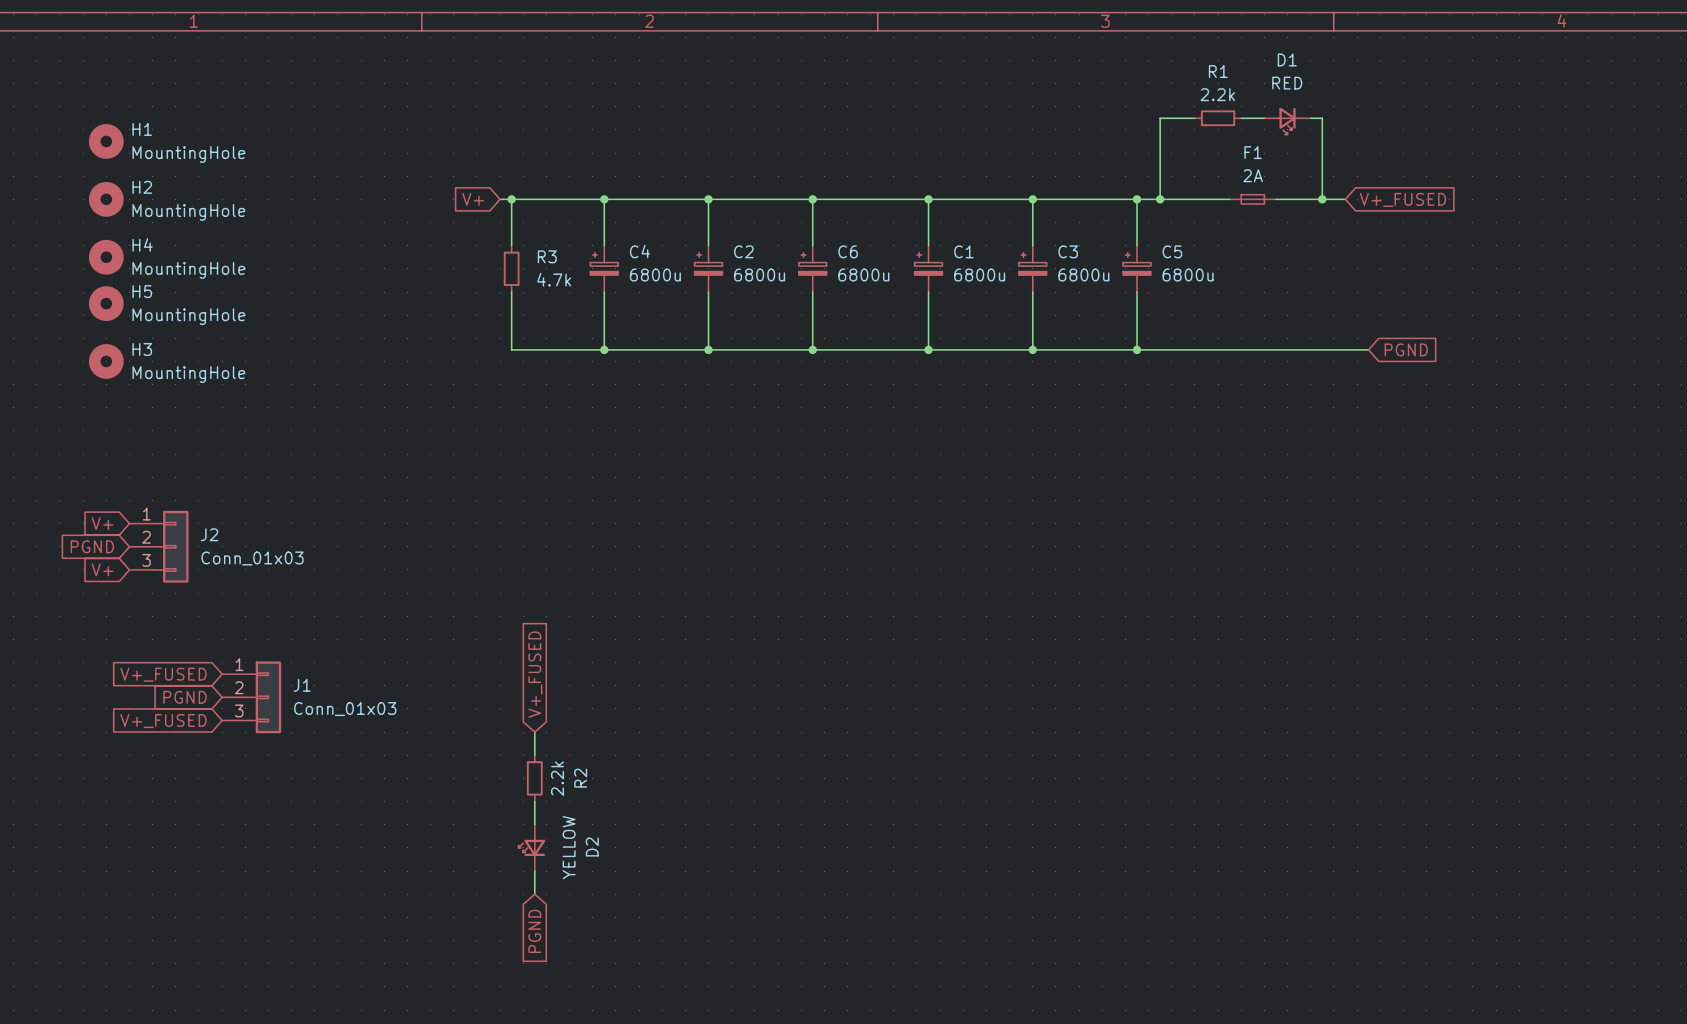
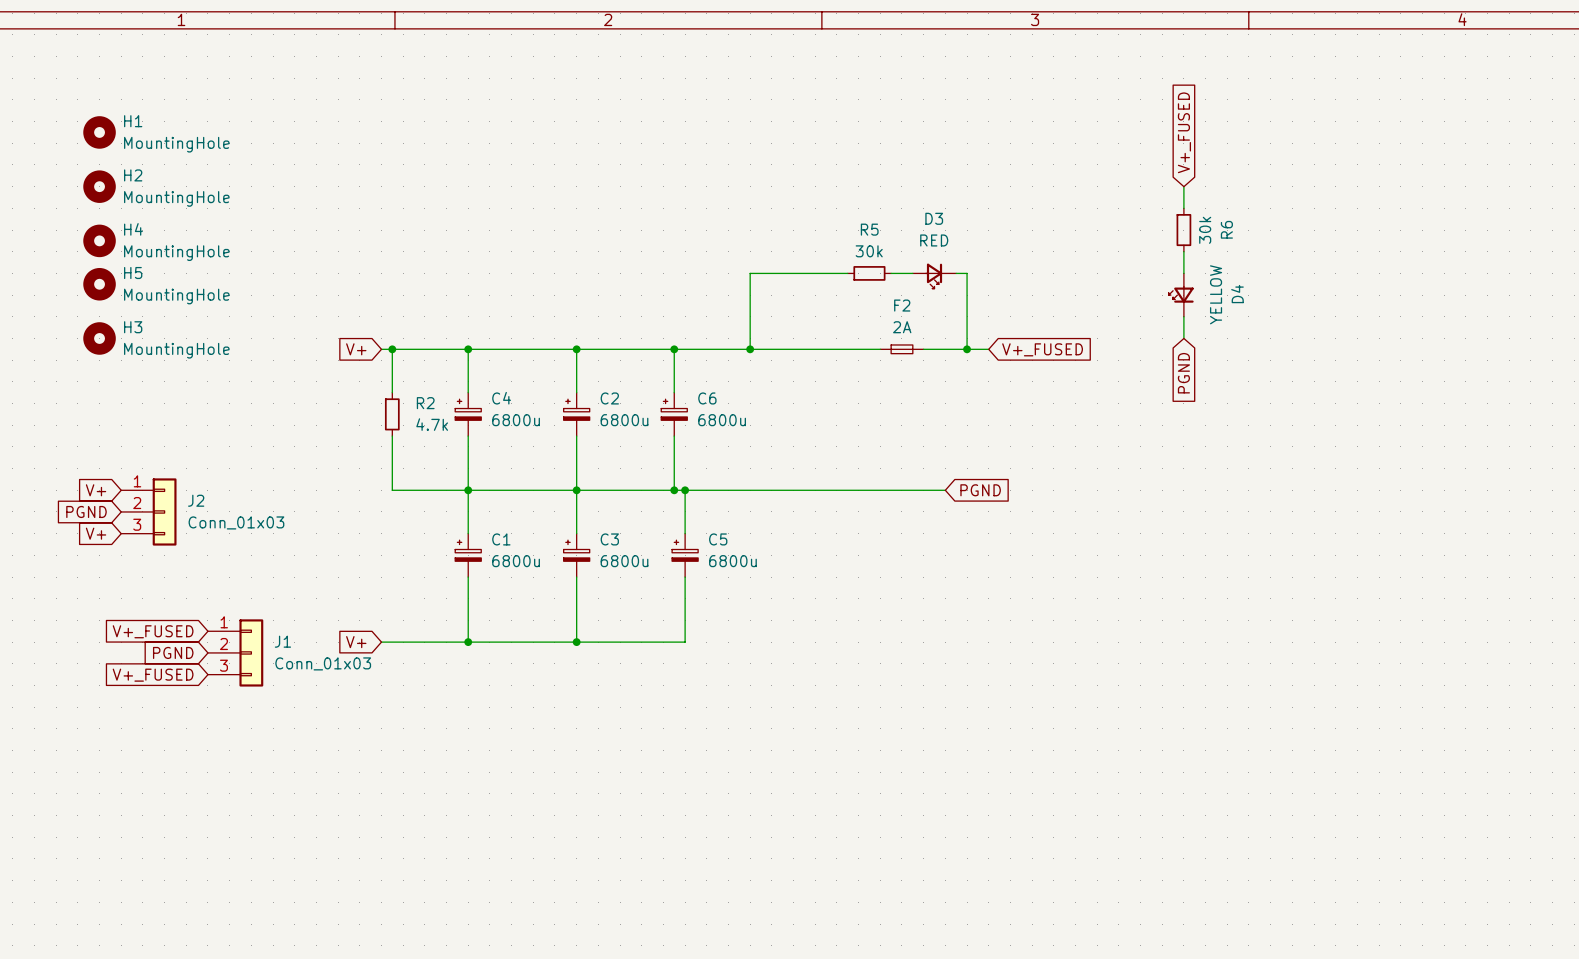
wire: (1194, 118) (1160, 118) (1160, 199) -> none
R1: 2.2k (1218, 118) -> none
wire: (1241, 118) (1264, 118) -> none
wire: (1310, 118) (1322, 118) (1322, 199) -> none
D1: RED (1287, 121) -> none
global label position: V+ (473, 199) -> V+ (356, 349)
wire: (500, 199) (1229, 199) -> none
wire: (511, 199) (511, 245) -> (392, 349) (392, 392)
junction: (511, 199) -> none
wire: (604, 199) (604, 245) -> (468, 349) (468, 392)
junction: (604, 199) -> none
wire: (708, 199) (708, 245) -> (576, 349) (576, 392)
junction: (708, 199) -> none
wire: (812, 199) (812, 245) -> (674, 349) (674, 392)
junction: (812, 199) -> none
wire: (928, 199) (928, 245) -> none
junction: (928, 199) -> none
wire: (1032, 199) (1032, 245) -> none
junction: (1032, 199) -> none
wire: (1137, 199) (1137, 245) -> none
junction: (1137, 199) -> none
junction: (1160, 199) -> none
F1: 2A (1252, 199) -> none
wire: none -> (1183, 186) (1183, 208)
wire: (1275, 199) (1345, 199) -> none
junction: (1322, 199) -> none
global label rotation: 0° (1402, 199) -> 90° counterclockwise (1184, 132)
global label position: V+_FUSED (1402, 199) -> V+_FUSED (1184, 132)
R6: none -> 30k (1183, 230)
R3: 4.7k (511, 268) -> none
C4 position: (604, 268) -> (468, 414)
C2 position: (708, 268) -> (576, 414)
C6 position: (812, 268) -> (674, 414)
C1 position: (928, 268) -> (468, 555)
C3 position: (1032, 268) -> (576, 555)
C5 position: (1137, 268) -> (685, 555)
wire: none -> (1183, 251) (1183, 273)
wire: (511, 292) (511, 349) (1368, 349) -> none
wire: (604, 292) (604, 349) -> none
wire: (708, 292) (708, 349) -> none
wire: (812, 292) (812, 349) -> (674, 436) (674, 490)
wire: none -> (847, 273) (750, 273) (750, 349)
wire: (928, 292) (928, 349) -> none
R5: none -> 30k (869, 273)
wire: none -> (891, 273) (912, 273)
wire: none -> (956, 273) (967, 273)
wire: (1137, 292) (1137, 349) -> none
D3: none -> RED (934, 276)
D4: none -> YELLOW (1181, 295)
wire: none -> (1183, 316) (1183, 338)
junction position: (604, 349) -> (576, 349)
junction position: (708, 349) -> (674, 349)
junction position: (812, 349) -> (750, 349)
junction: (928, 349) -> none
wire: none -> (967, 327) (967, 349)
junction position: (1032, 349) -> (967, 349)
junction: (1137, 349) -> none
global label rotation: 0° (1406, 349) -> 90° clockwise (1183, 373)
global label position: PGND (1406, 349) -> PGND (1183, 373)
wire: none -> (381, 349) (880, 349)
junction: none -> (392, 349)
junction: none -> (468, 349)
F2: none -> 2A (901, 349)
wire: none -> (923, 349) (988, 349)
global label: none -> V+_FUSED (1042, 349)
wire: none -> (392, 436) (392, 490) (945, 490)
wire: none -> (468, 436) (468, 533)
wire: none -> (576, 436) (576, 533)
junction: none -> (468, 490)
junction: none -> (576, 490)
junction: none -> (674, 490)
wire: none -> (685, 490) (685, 533)
junction: none -> (685, 490)
global label: none -> PGND (980, 490)
wire: none -> (468, 577) (468, 642)
wire: none -> (576, 577) (576, 642)
wire: none -> (685, 577) (685, 642) (381, 642)
global label: V+_FUSED (535, 674) -> none
global label: none -> V+ (356, 642)
junction: none -> (468, 642)
junction: none -> (576, 642)
wire: (534, 732) (534, 755) -> none
R2 position: (534, 778) -> (392, 414)
R2 value: 2.2k (557, 778) -> 4.7k (432, 424)
R2 name rotation: 0° (580, 778) -> 90° clockwise (425, 403)
wire: (534, 801) (534, 824) -> none
D2: YELLOW (531, 847) -> none
wire: (534, 871) (534, 894) -> none
global label: PGND (534, 931) -> none

